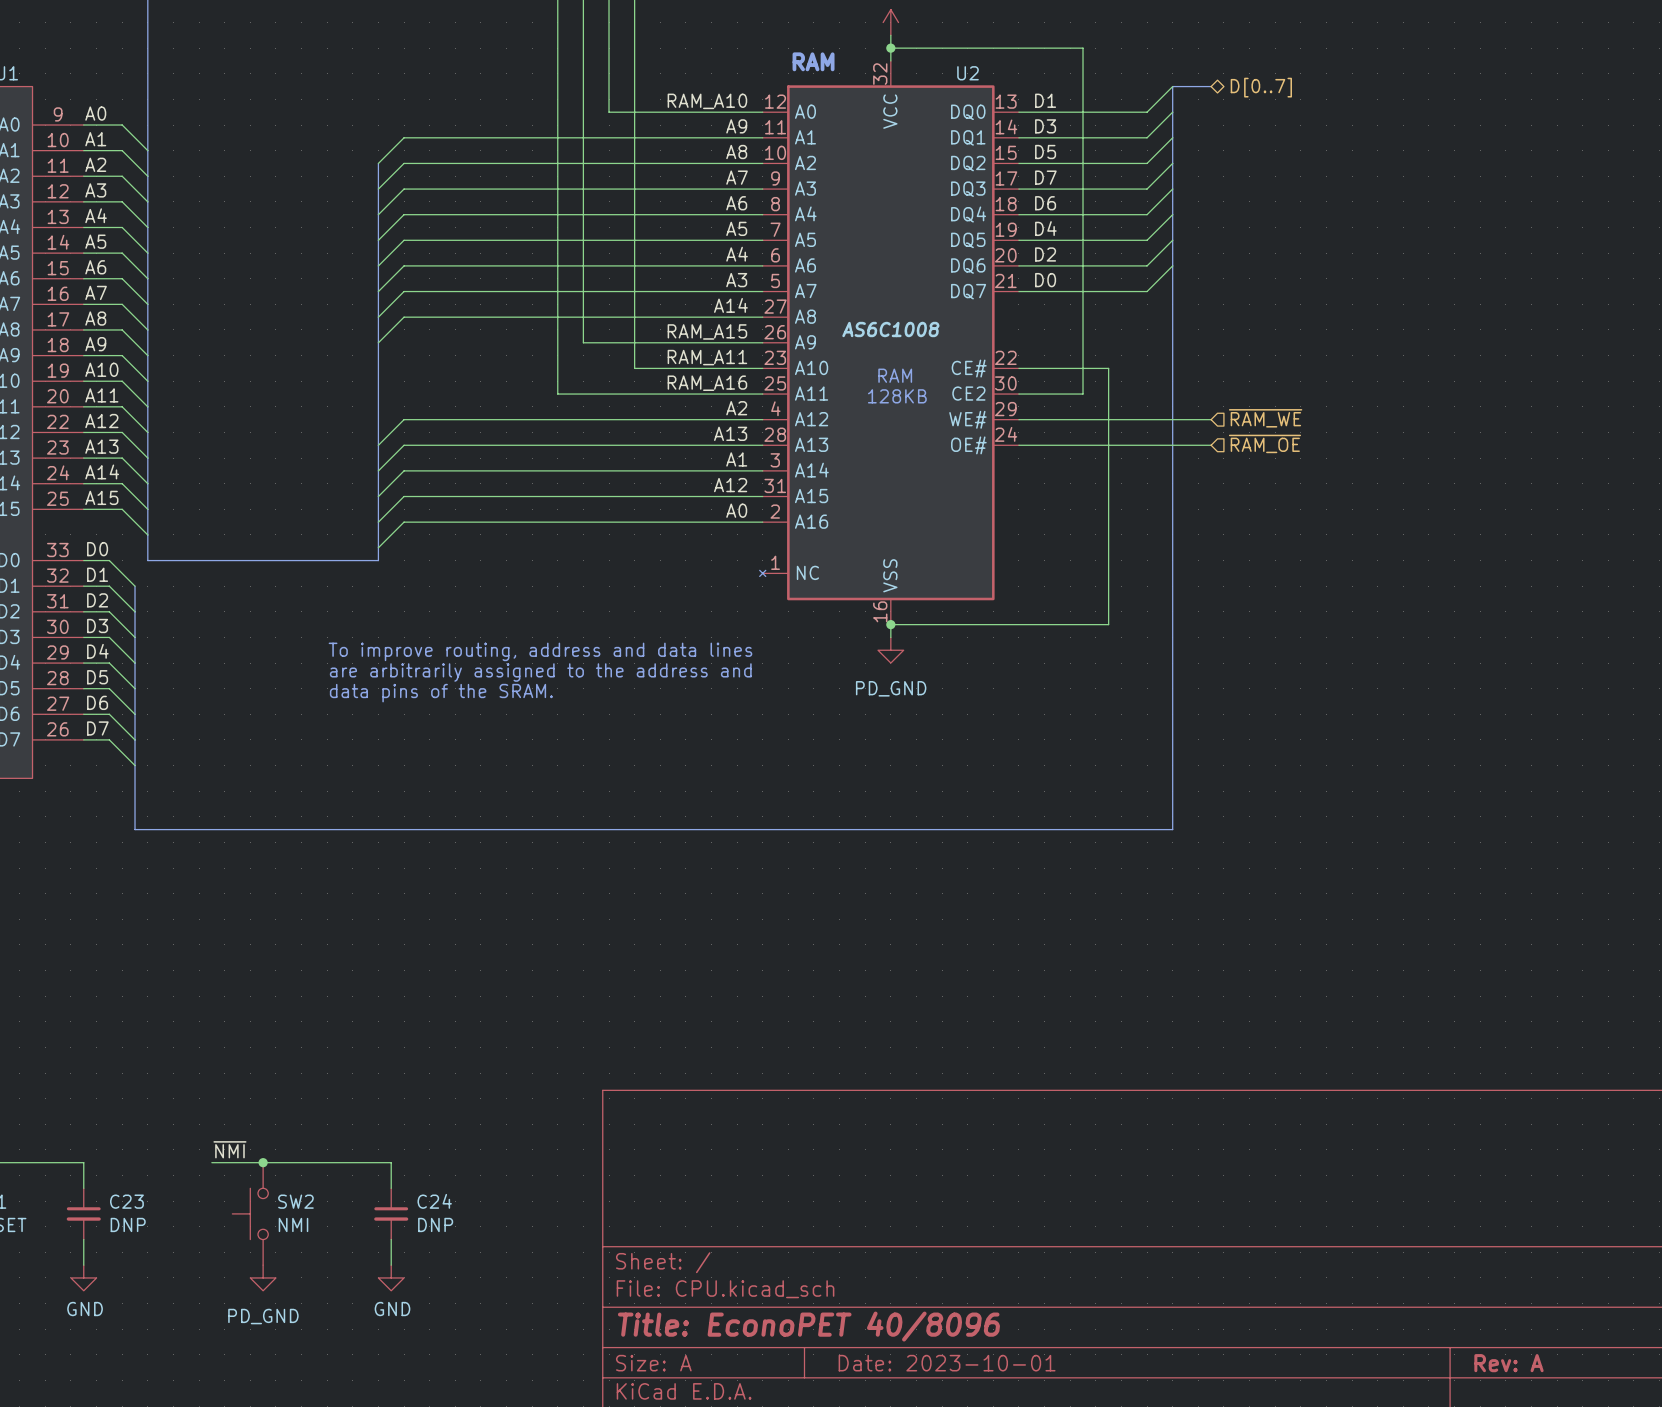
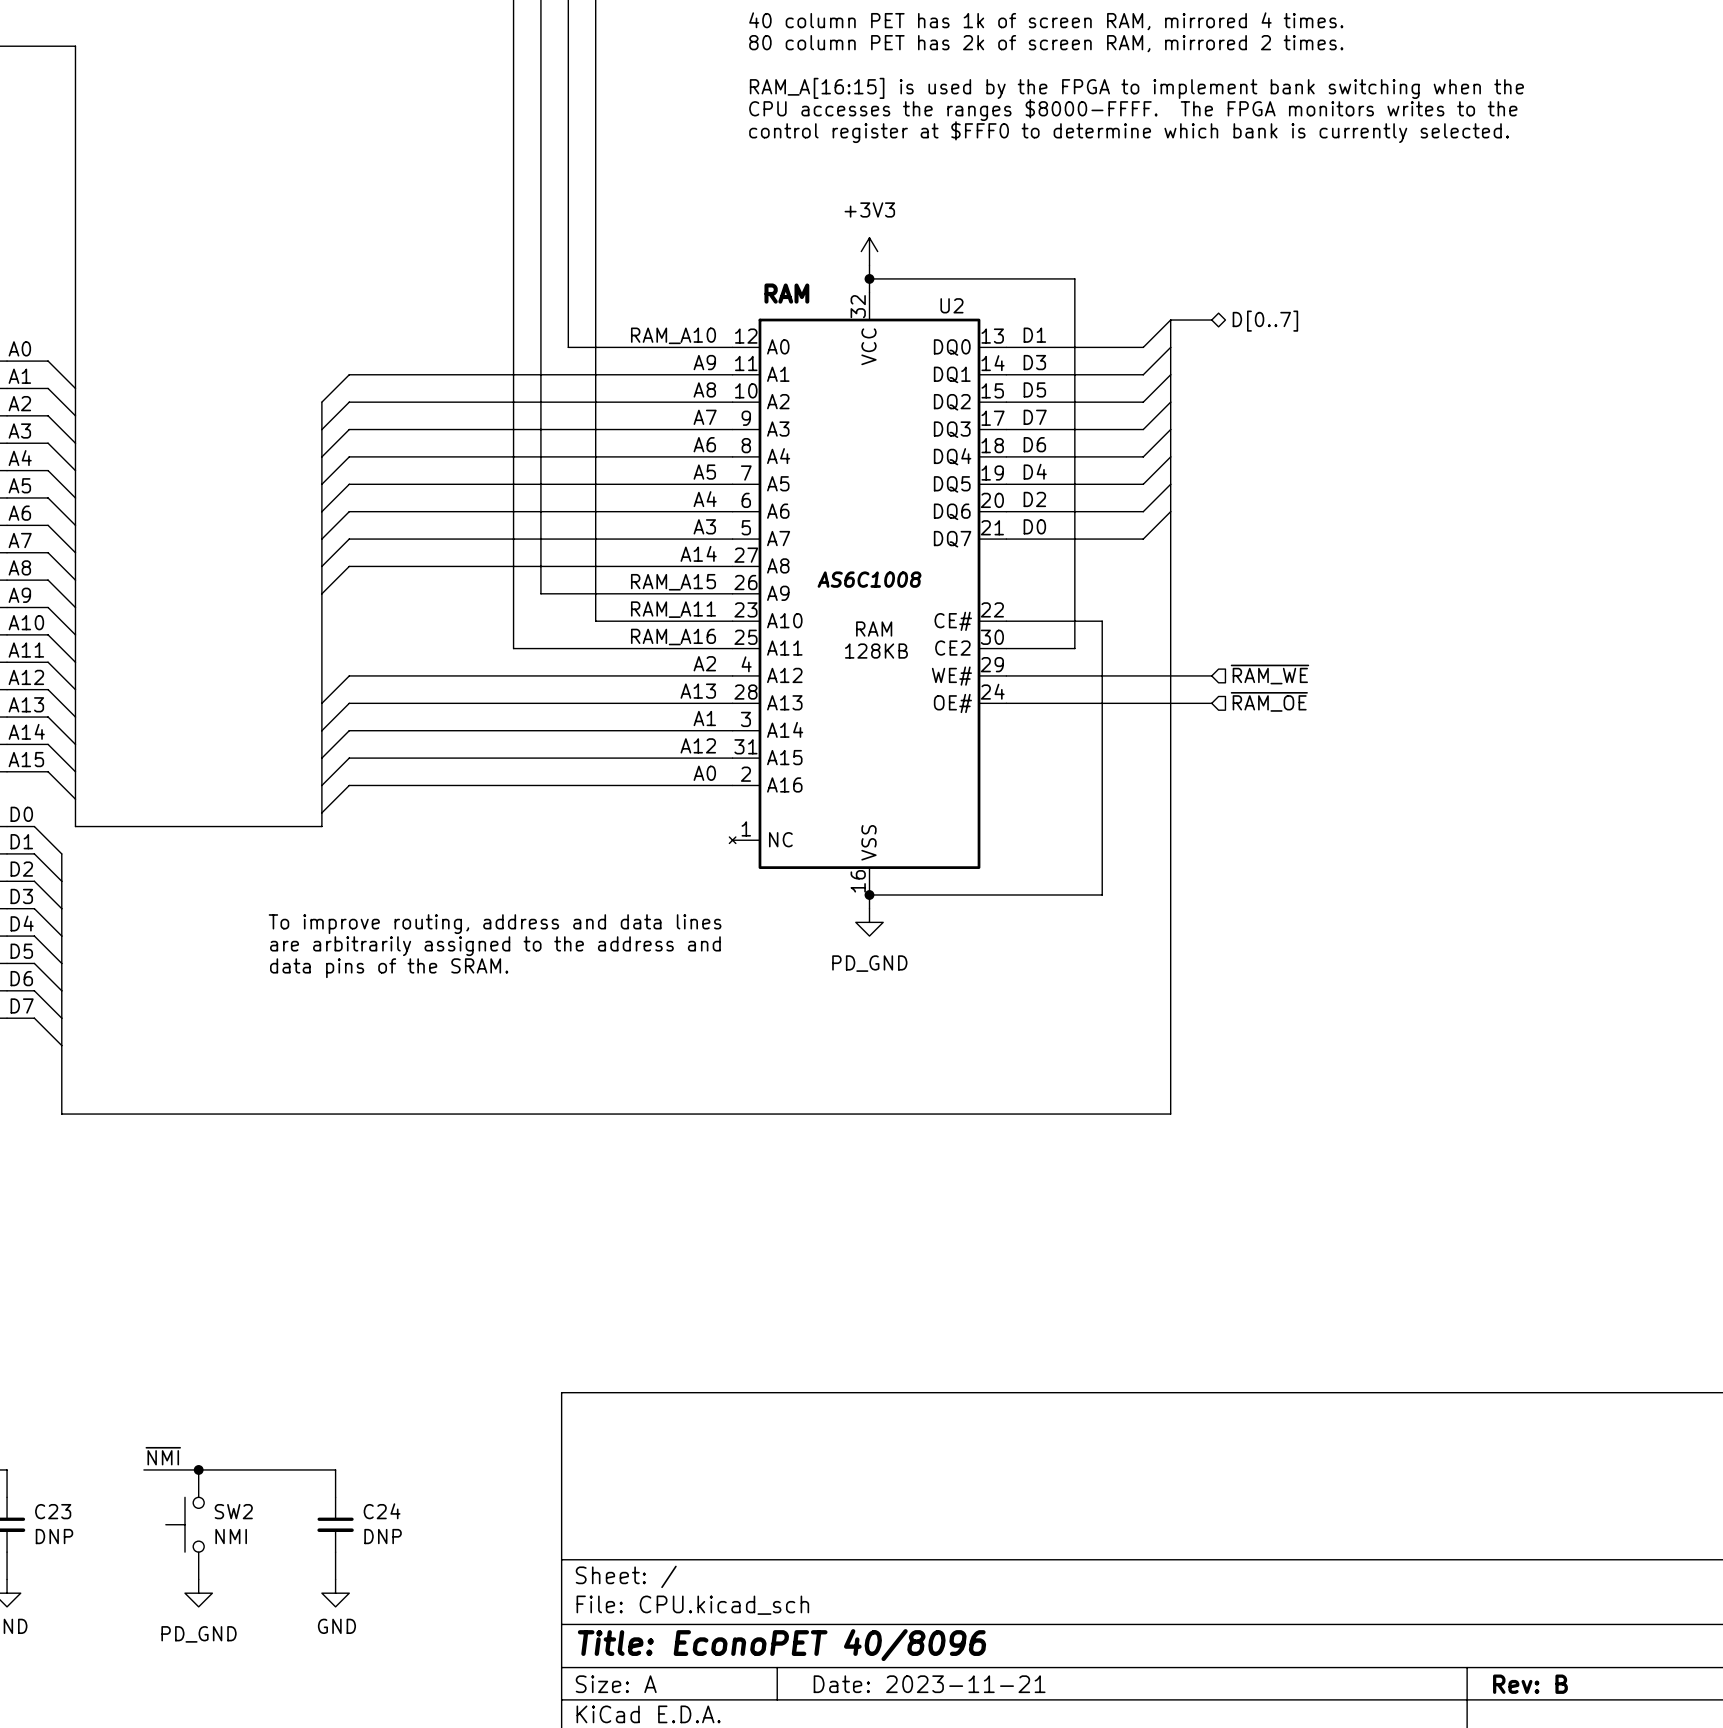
title block: Date: 2023-10-01 (947, 1363) -> Date: 2023-11-21 (929, 1684)
title block: Rev: A (1508, 1363) -> Rev: B (1530, 1684)

